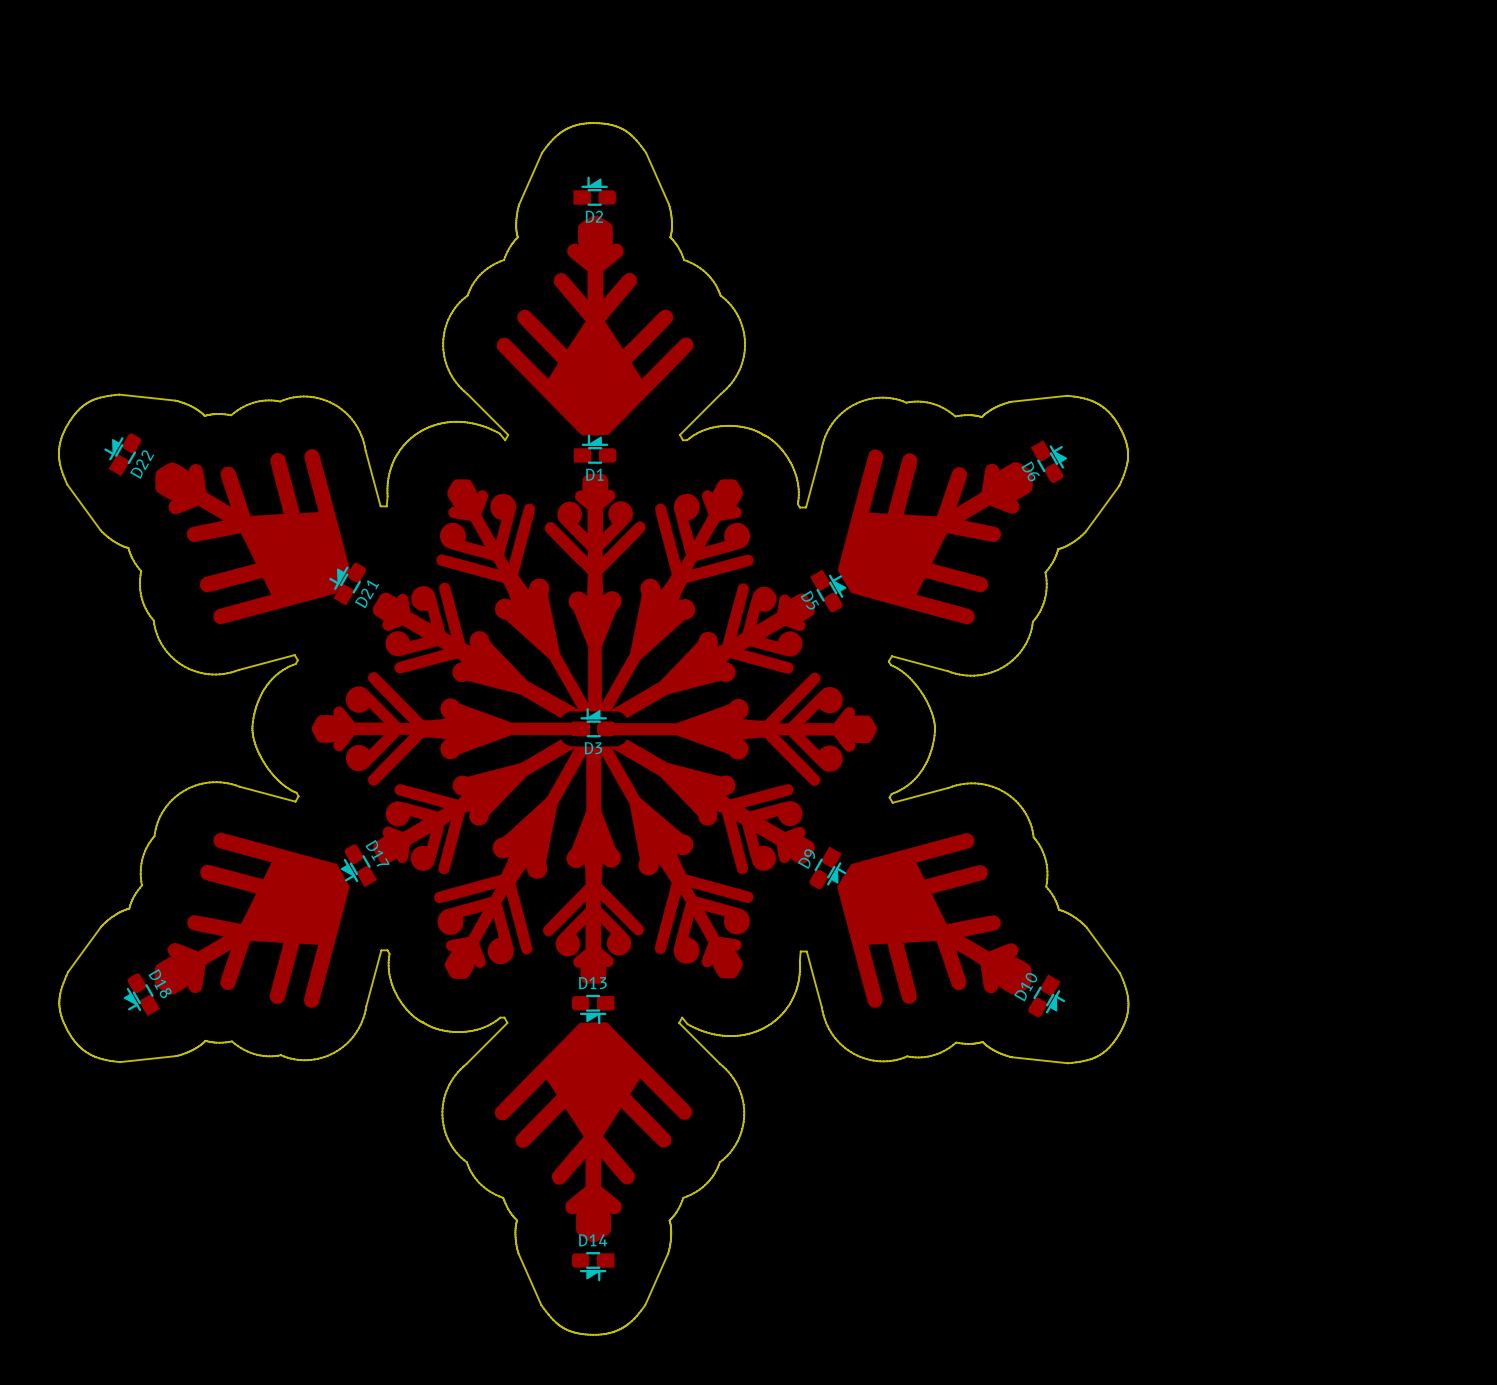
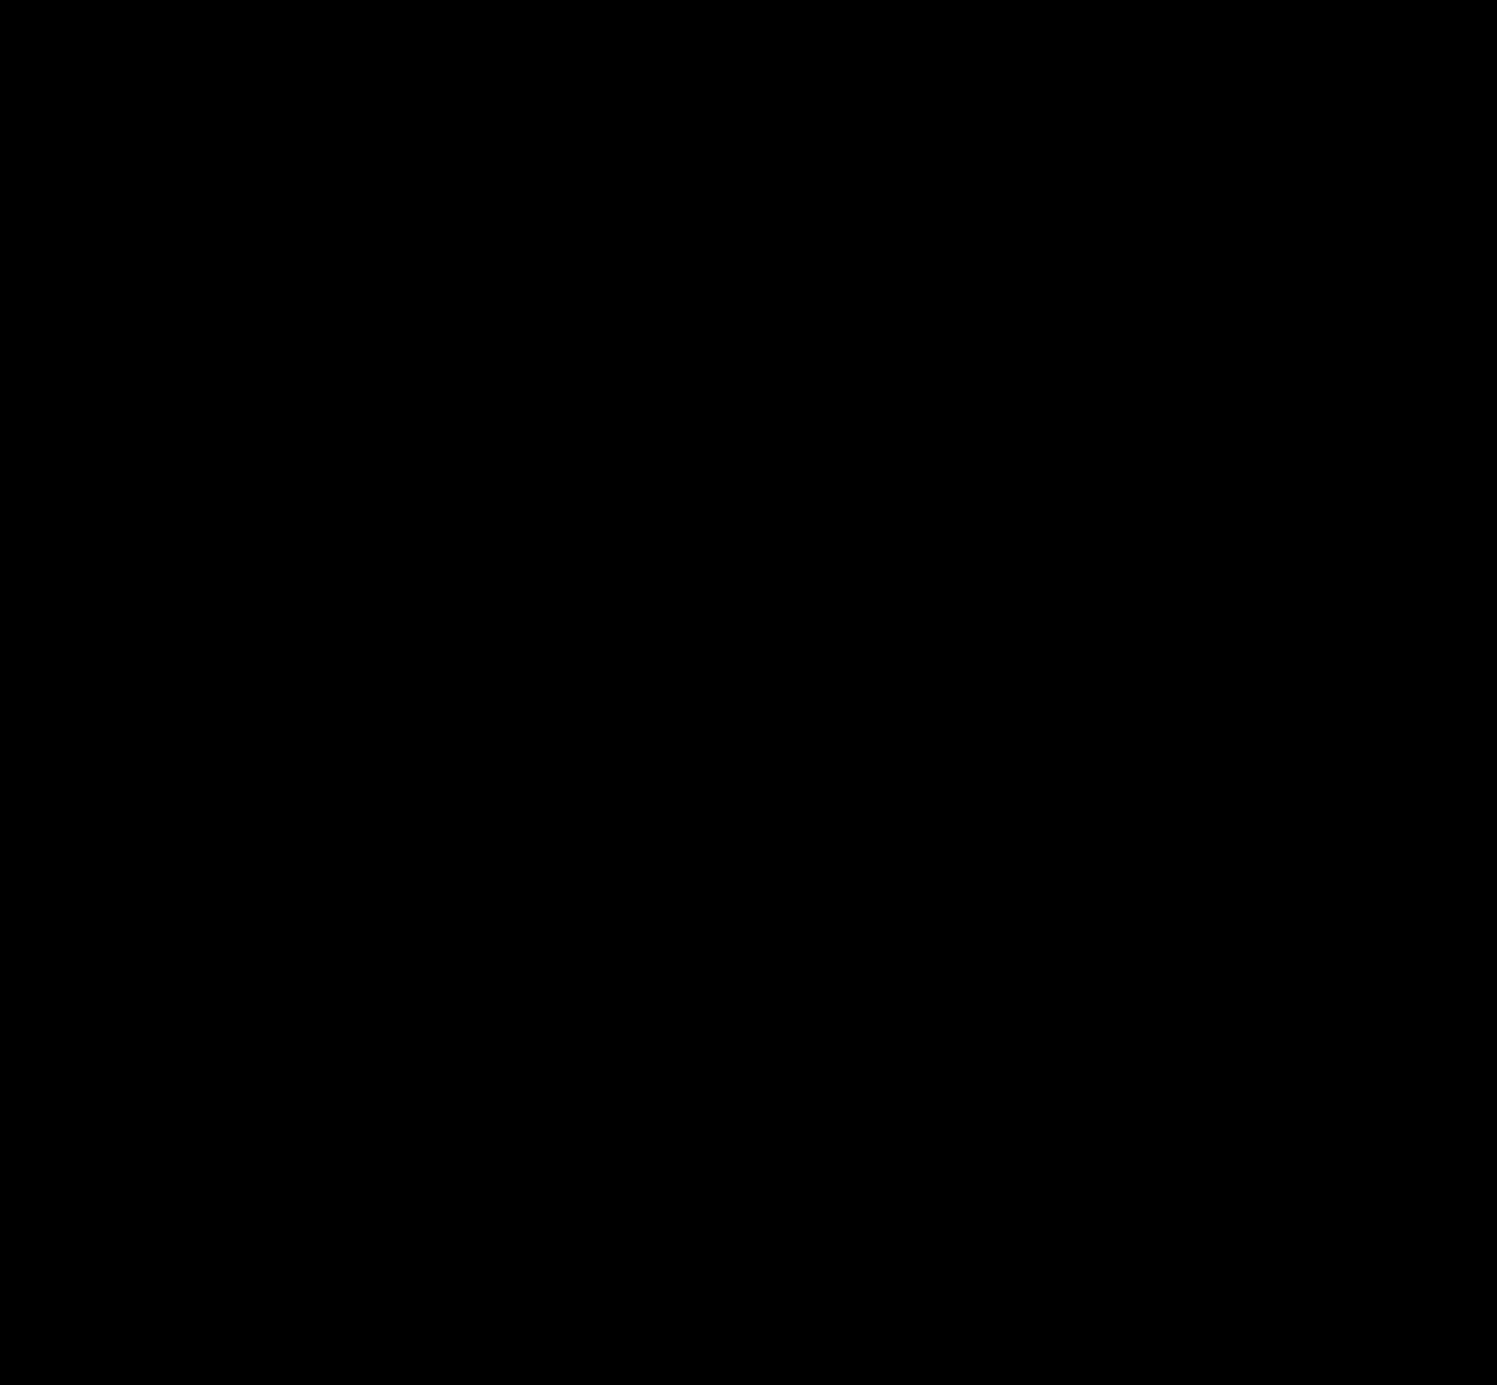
D2: (594, 191) -> none
D1: (595, 449) -> none
D22: (122, 454) -> none
D6: (1049, 461) -> none
D21: (347, 584) -> none
D5: (828, 590) -> none
D3: (593, 722) -> none
part: (593, 728) -> none
D17: (358, 865) -> none
D9: (827, 867) -> none
D18: (141, 994) -> none
D10: (1046, 995) -> none
D13: (593, 1009) -> none
D14: (593, 1266) -> none

